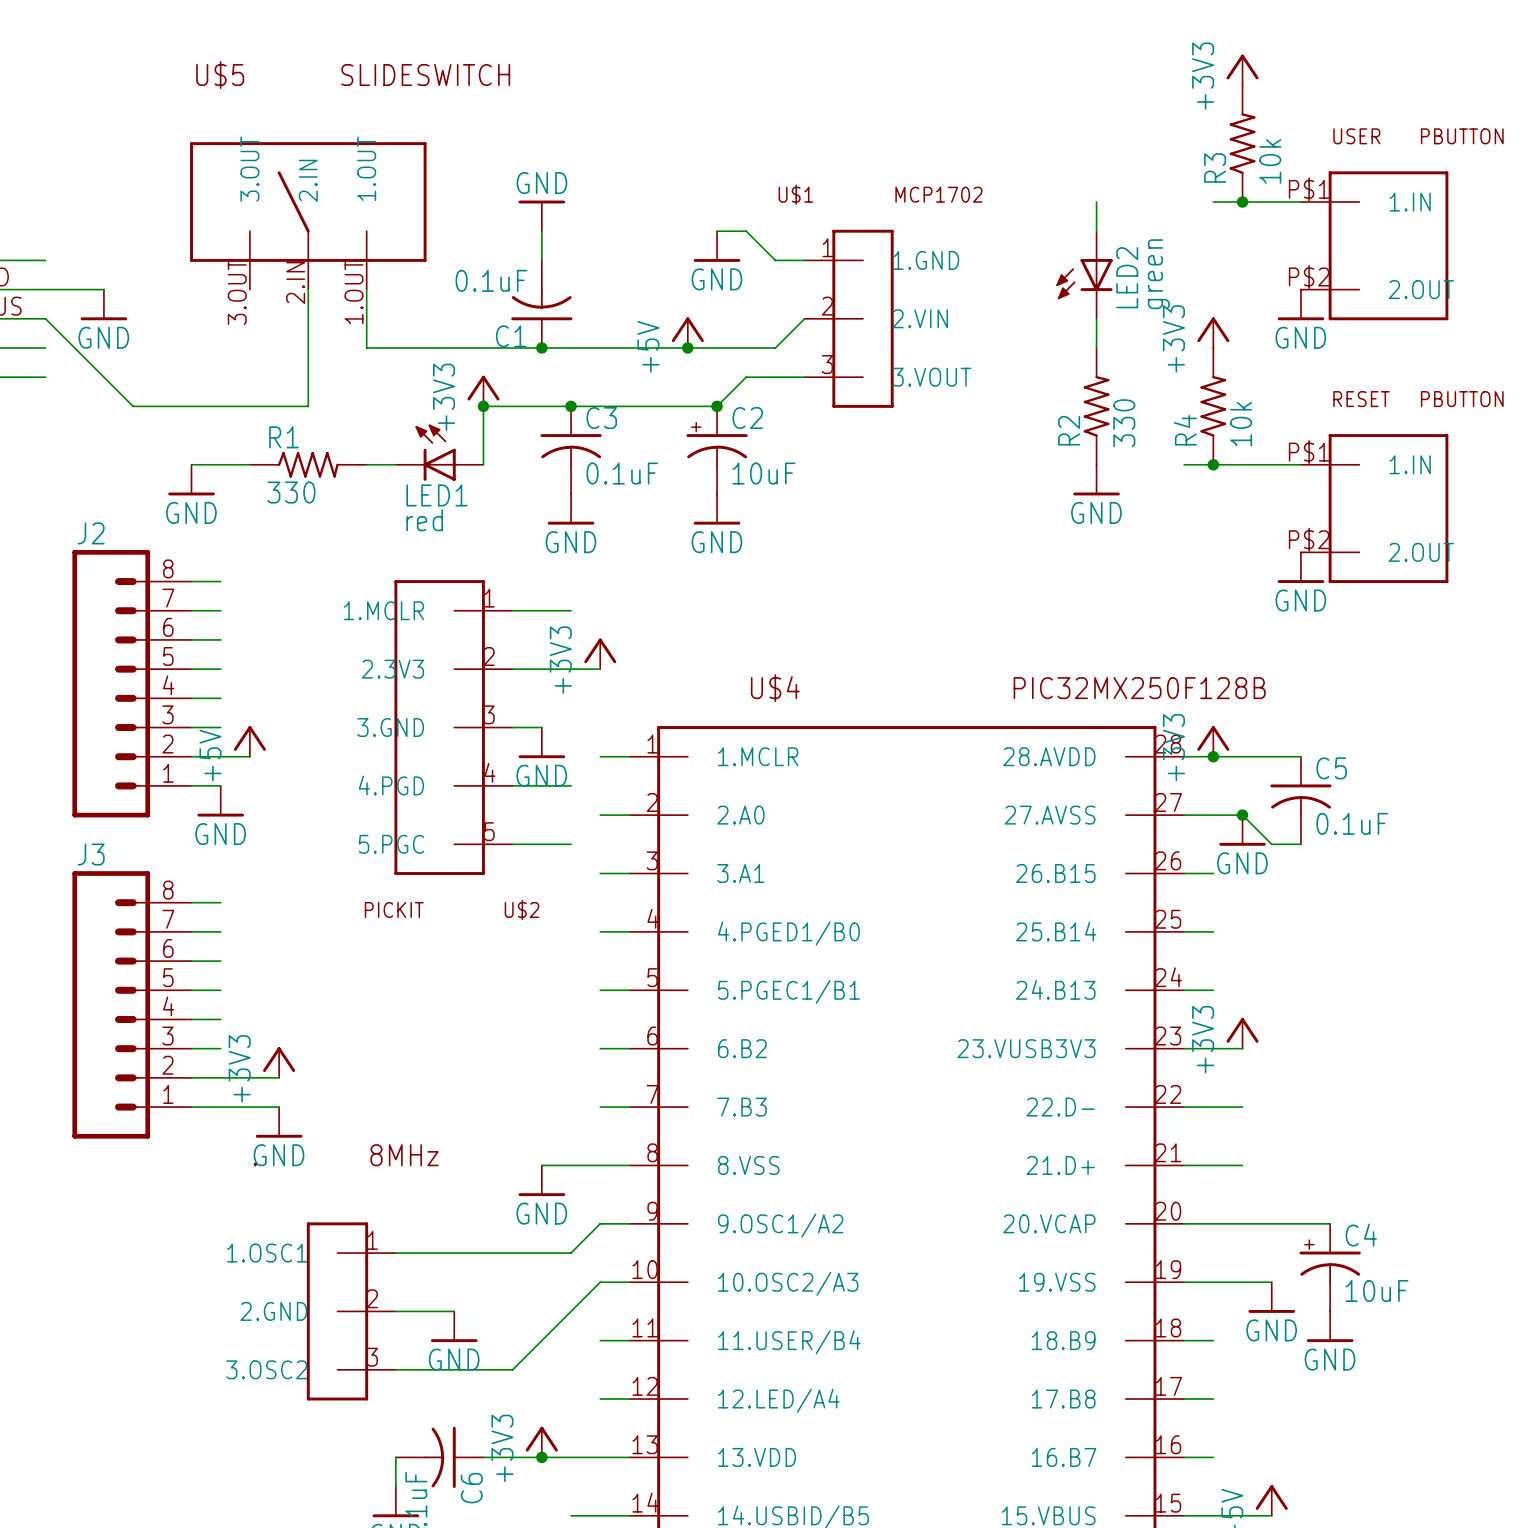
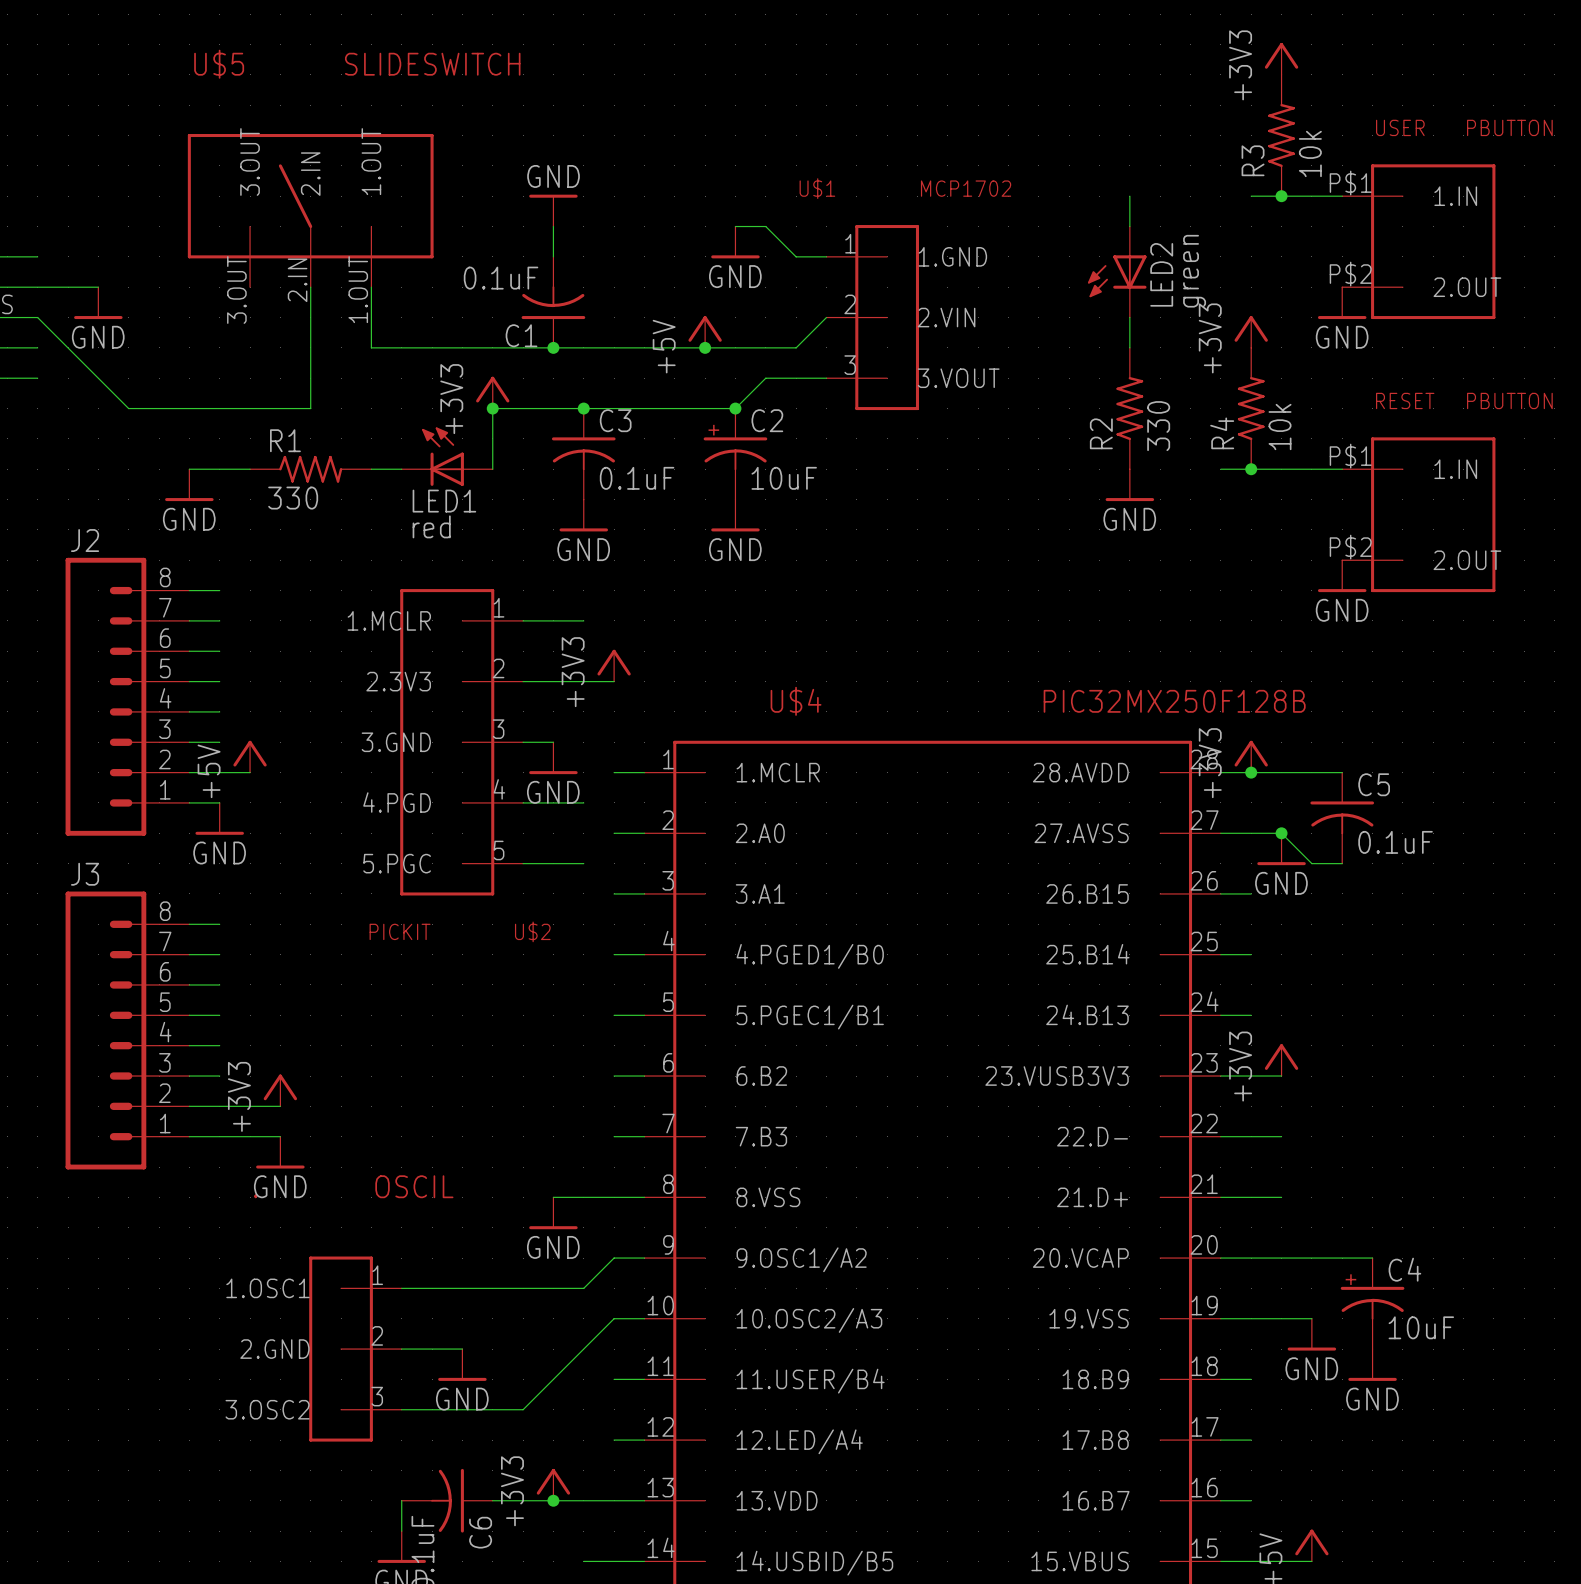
part value: 8MHz (404, 1155) -> OSCIL (414, 1186)

